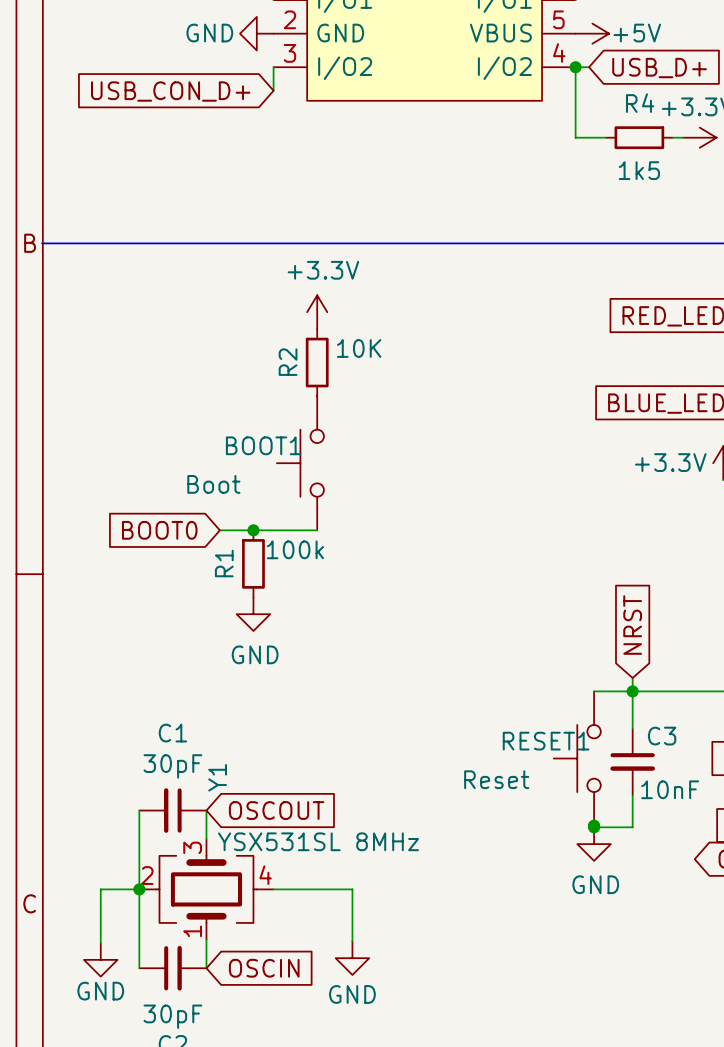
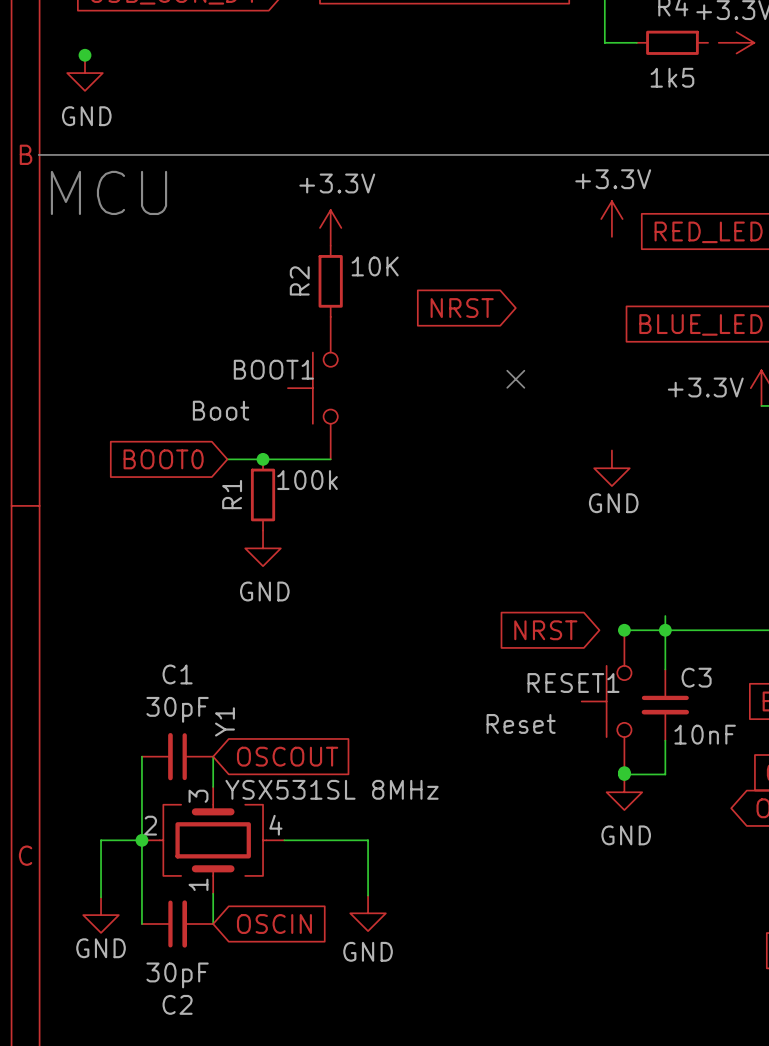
wire: (672, 137) (682, 137) -> none
junction: none -> (85, 55)
power symbol: none -> GND (85, 73)
text: none -> MCU (108, 192)
power symbol: none -> +3.3V (611, 219)
global label: none -> NRST (462, 308)
no-connect mark: none -> (515, 379)
power symbol: none -> GND (611, 468)
global label rotation: 0° (632, 625) -> 90° counterclockwise (545, 630)
global label position: NRST (632, 625) -> NRST (545, 630)
junction: none -> (624, 630)

